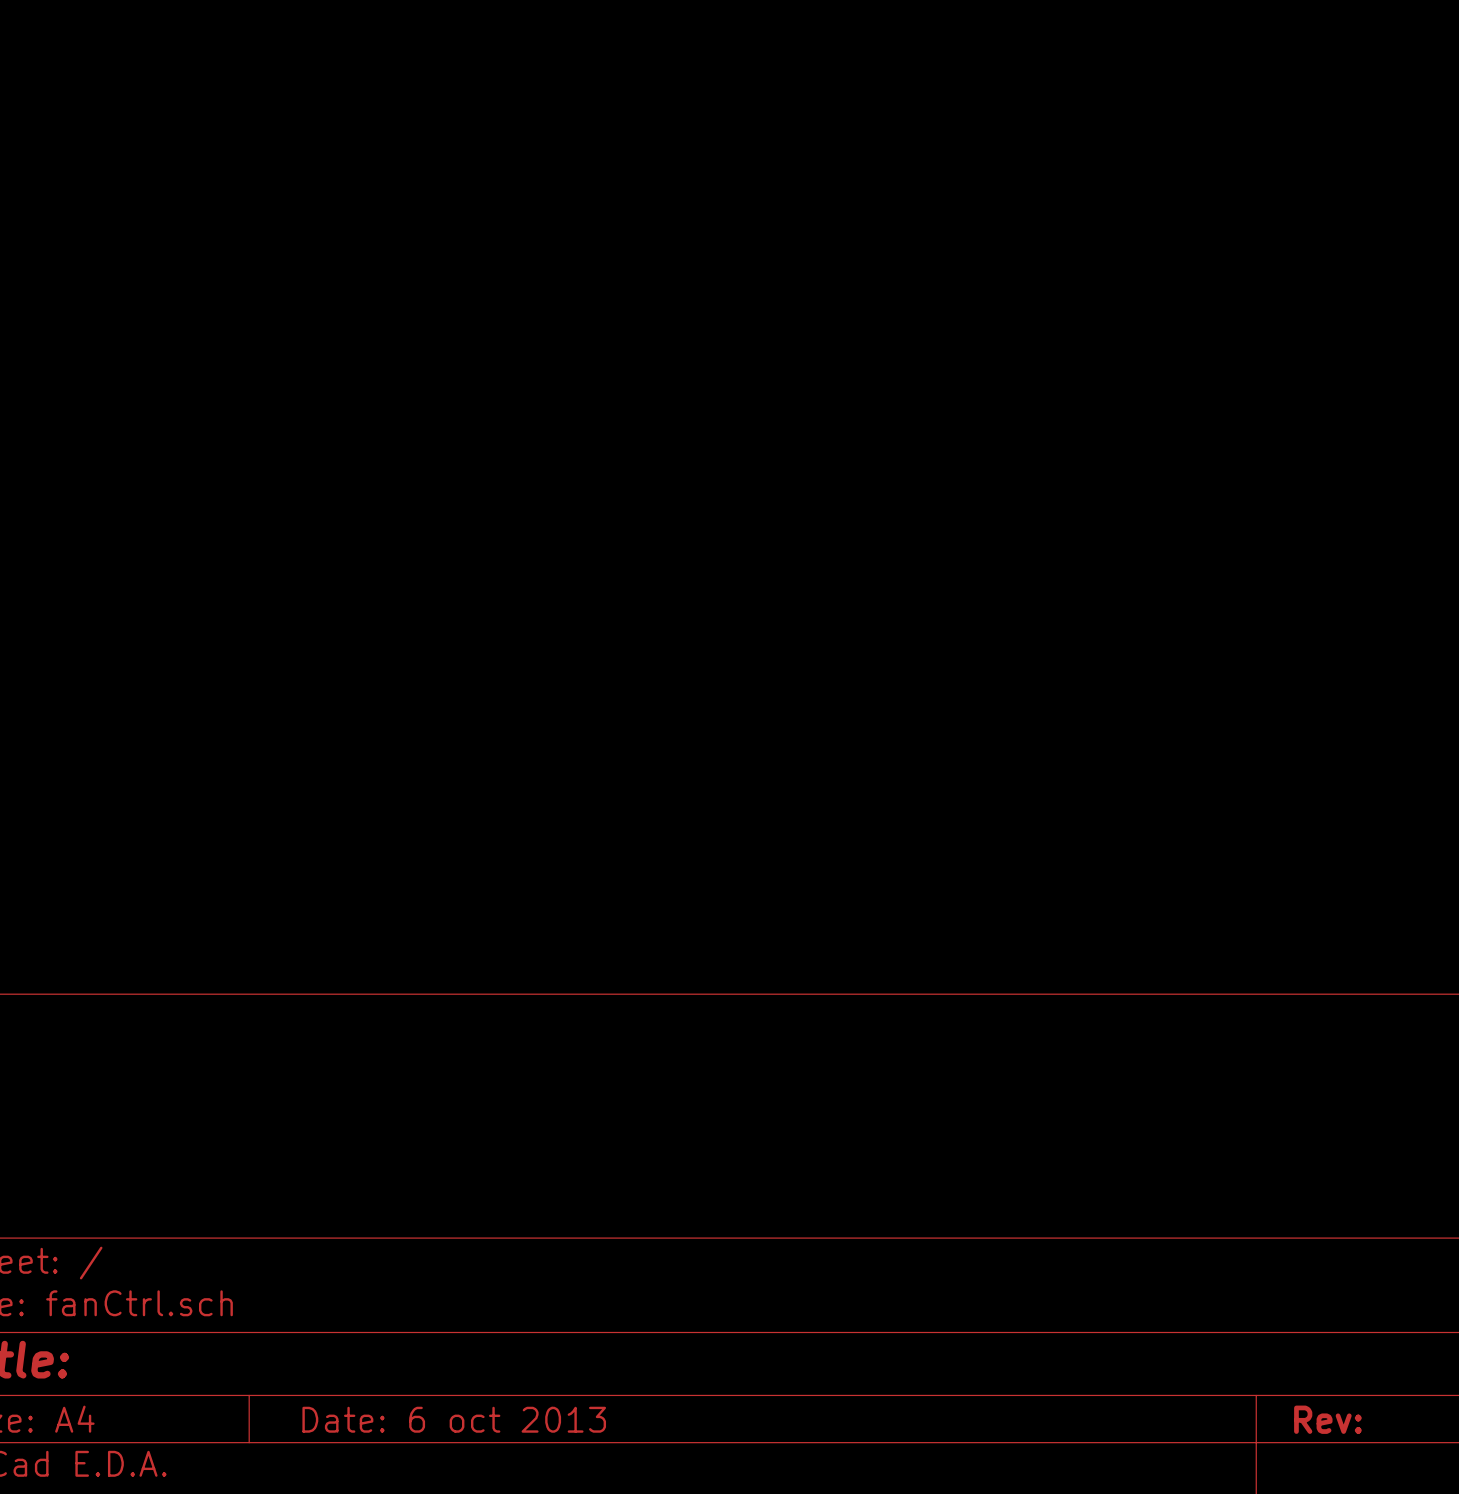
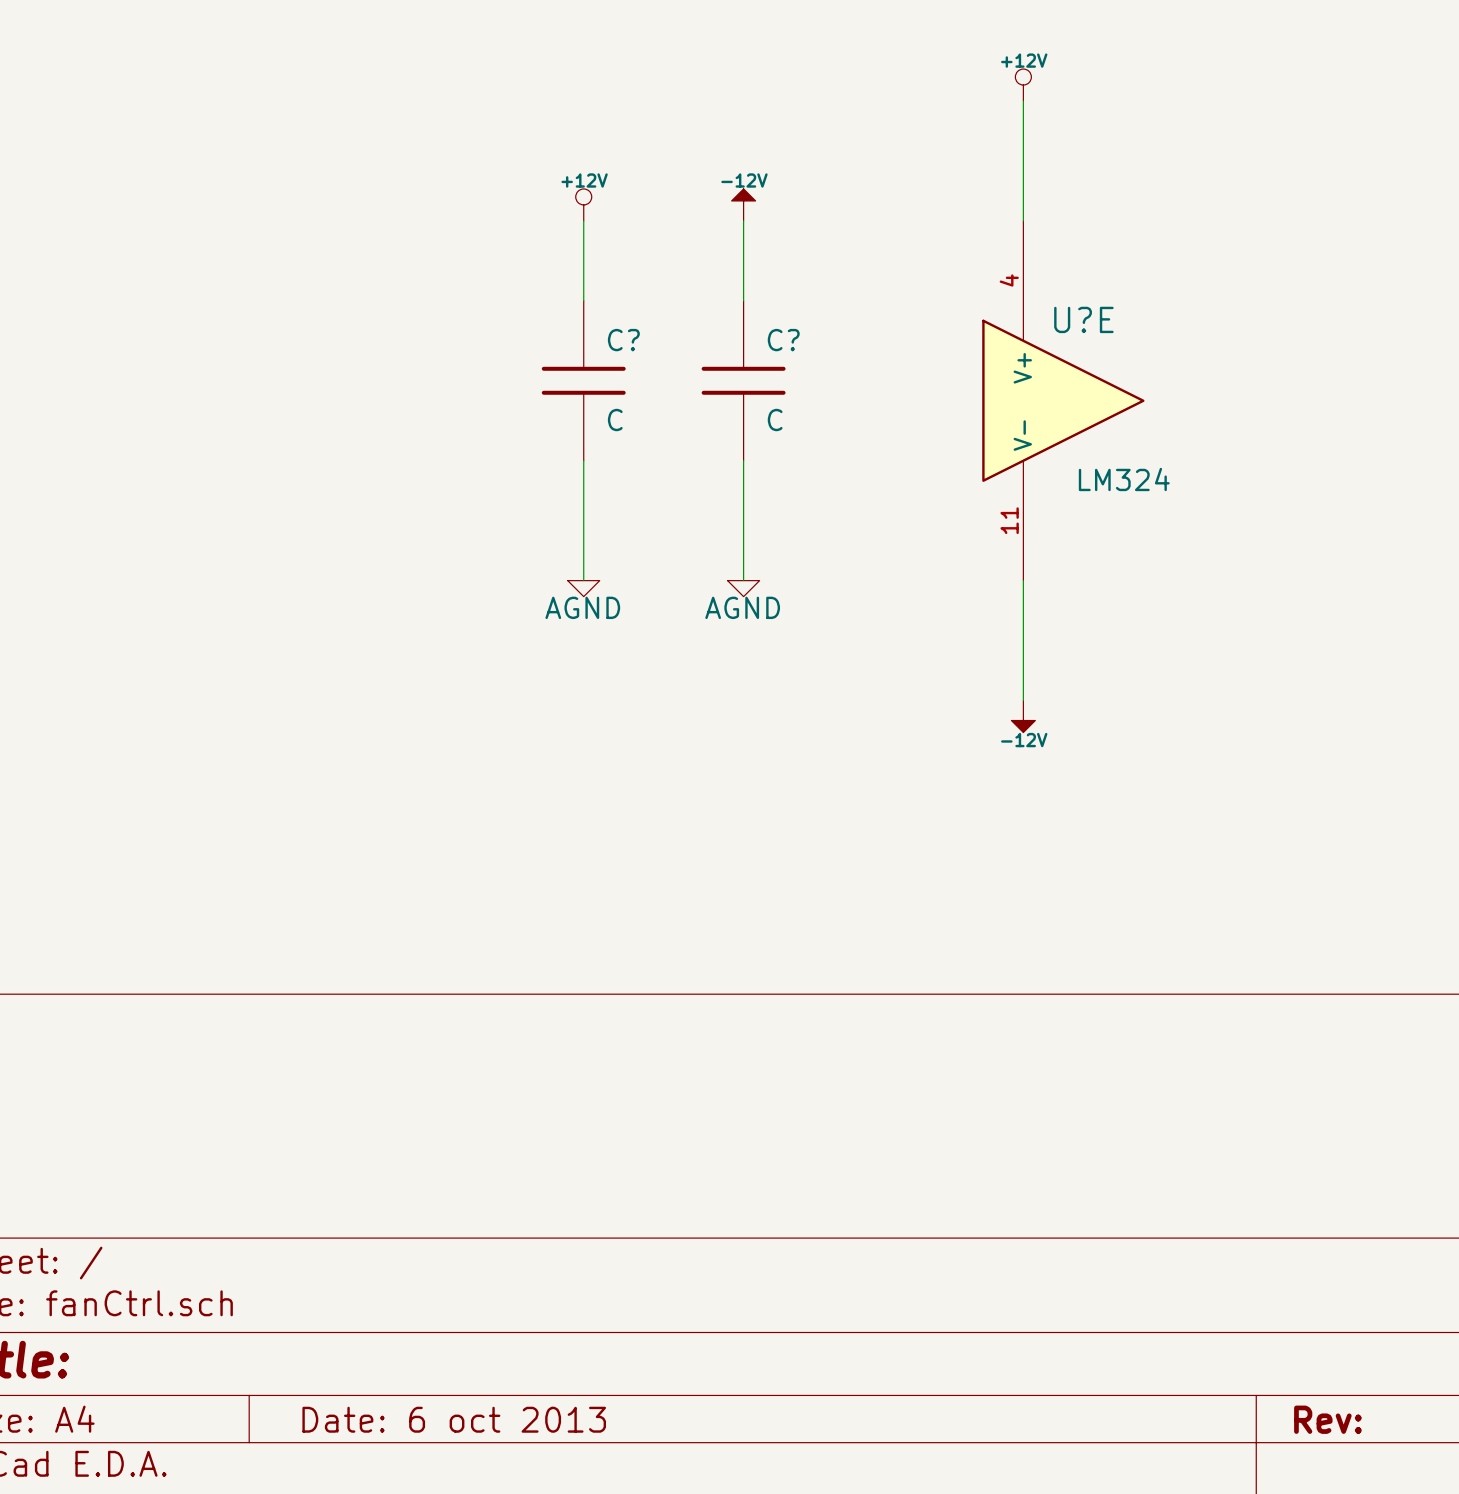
power symbol: none -> +12V (1023, 85)
wire: none -> (1023, 101) (1023, 220)
power symbol: none -> +12V (583, 204)
power symbol: none -> -12V (743, 204)
wire: none -> (583, 220) (583, 300)
wire: none -> (743, 220) (743, 300)
C?: none -> C (583, 380)
C?: none -> C (743, 380)
U?E: none -> LM324 (1063, 400)
wire: none -> (583, 460) (583, 580)
wire: none -> (743, 460) (743, 580)
wire: none -> (1023, 580) (1023, 700)
power symbol: none -> AGND (583, 588)
power symbol: none -> AGND (743, 588)
power symbol: none -> -12V (1023, 716)

